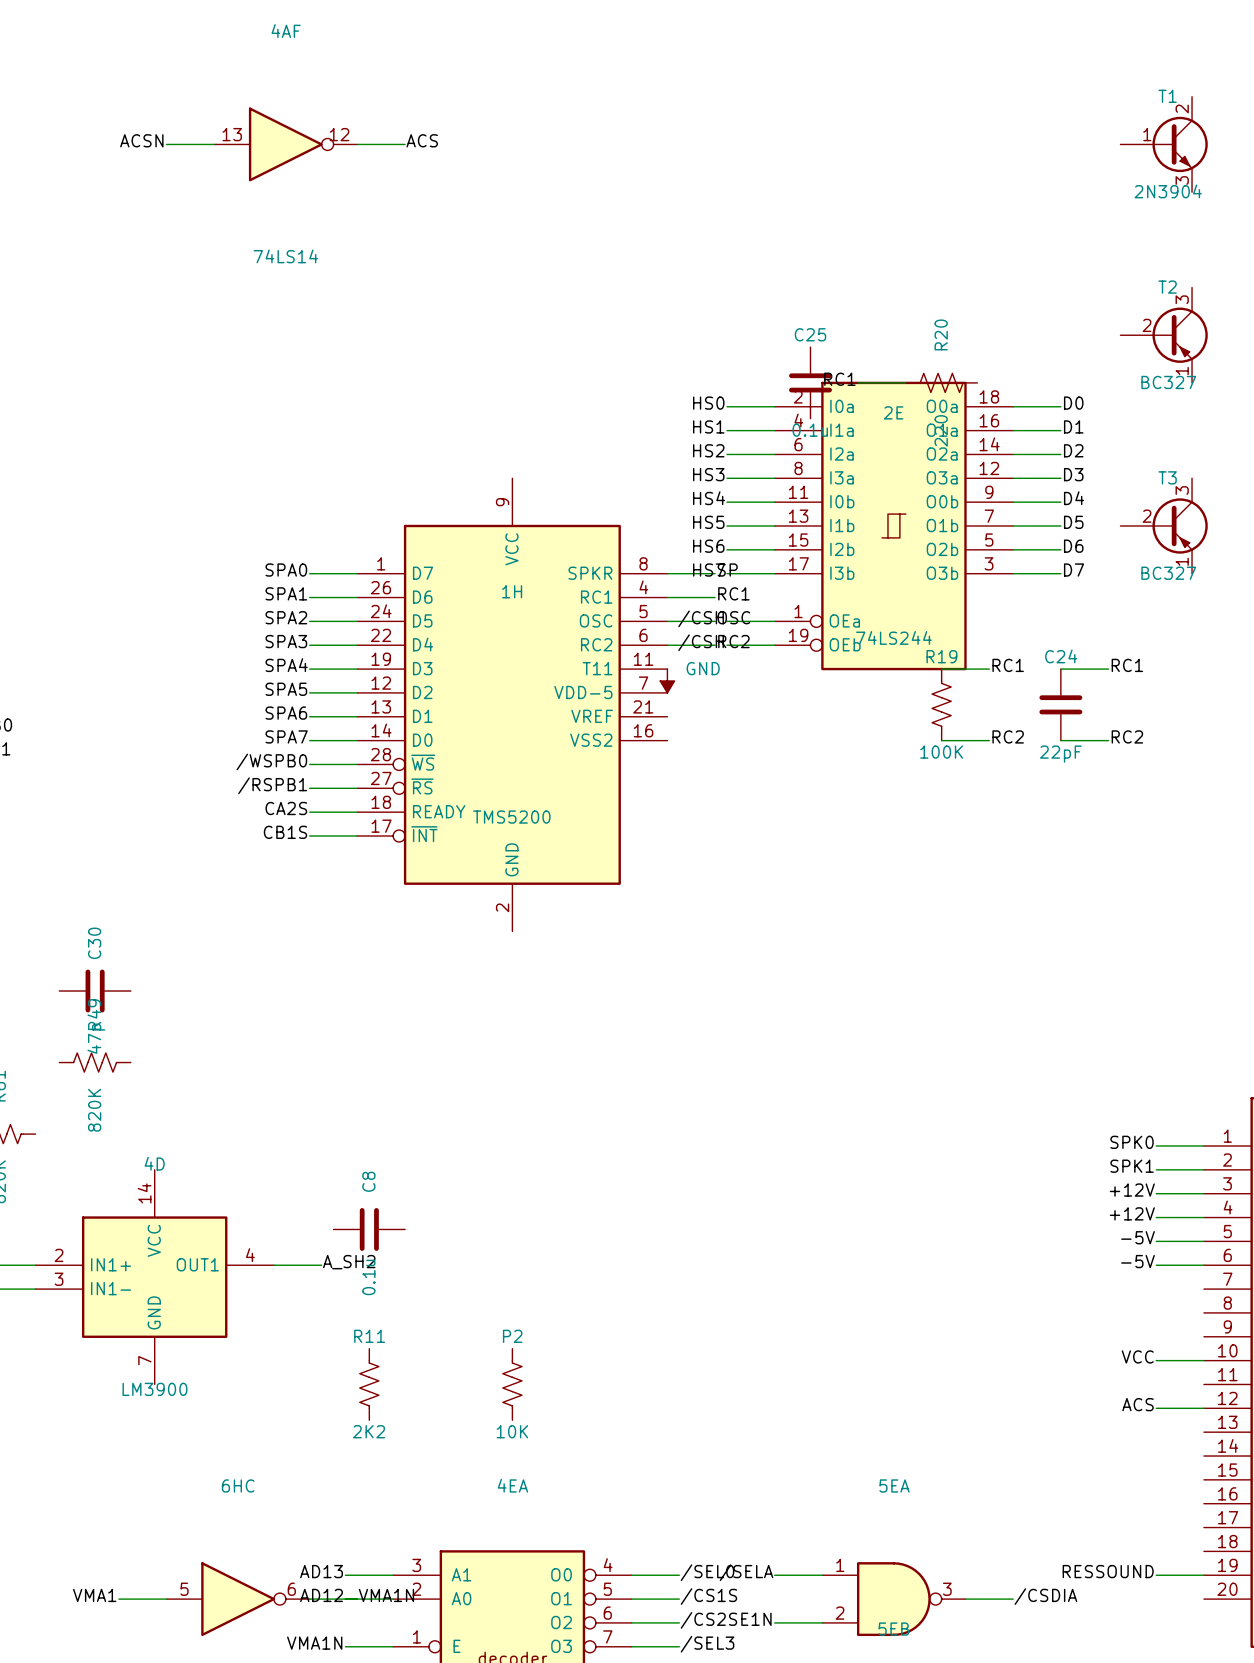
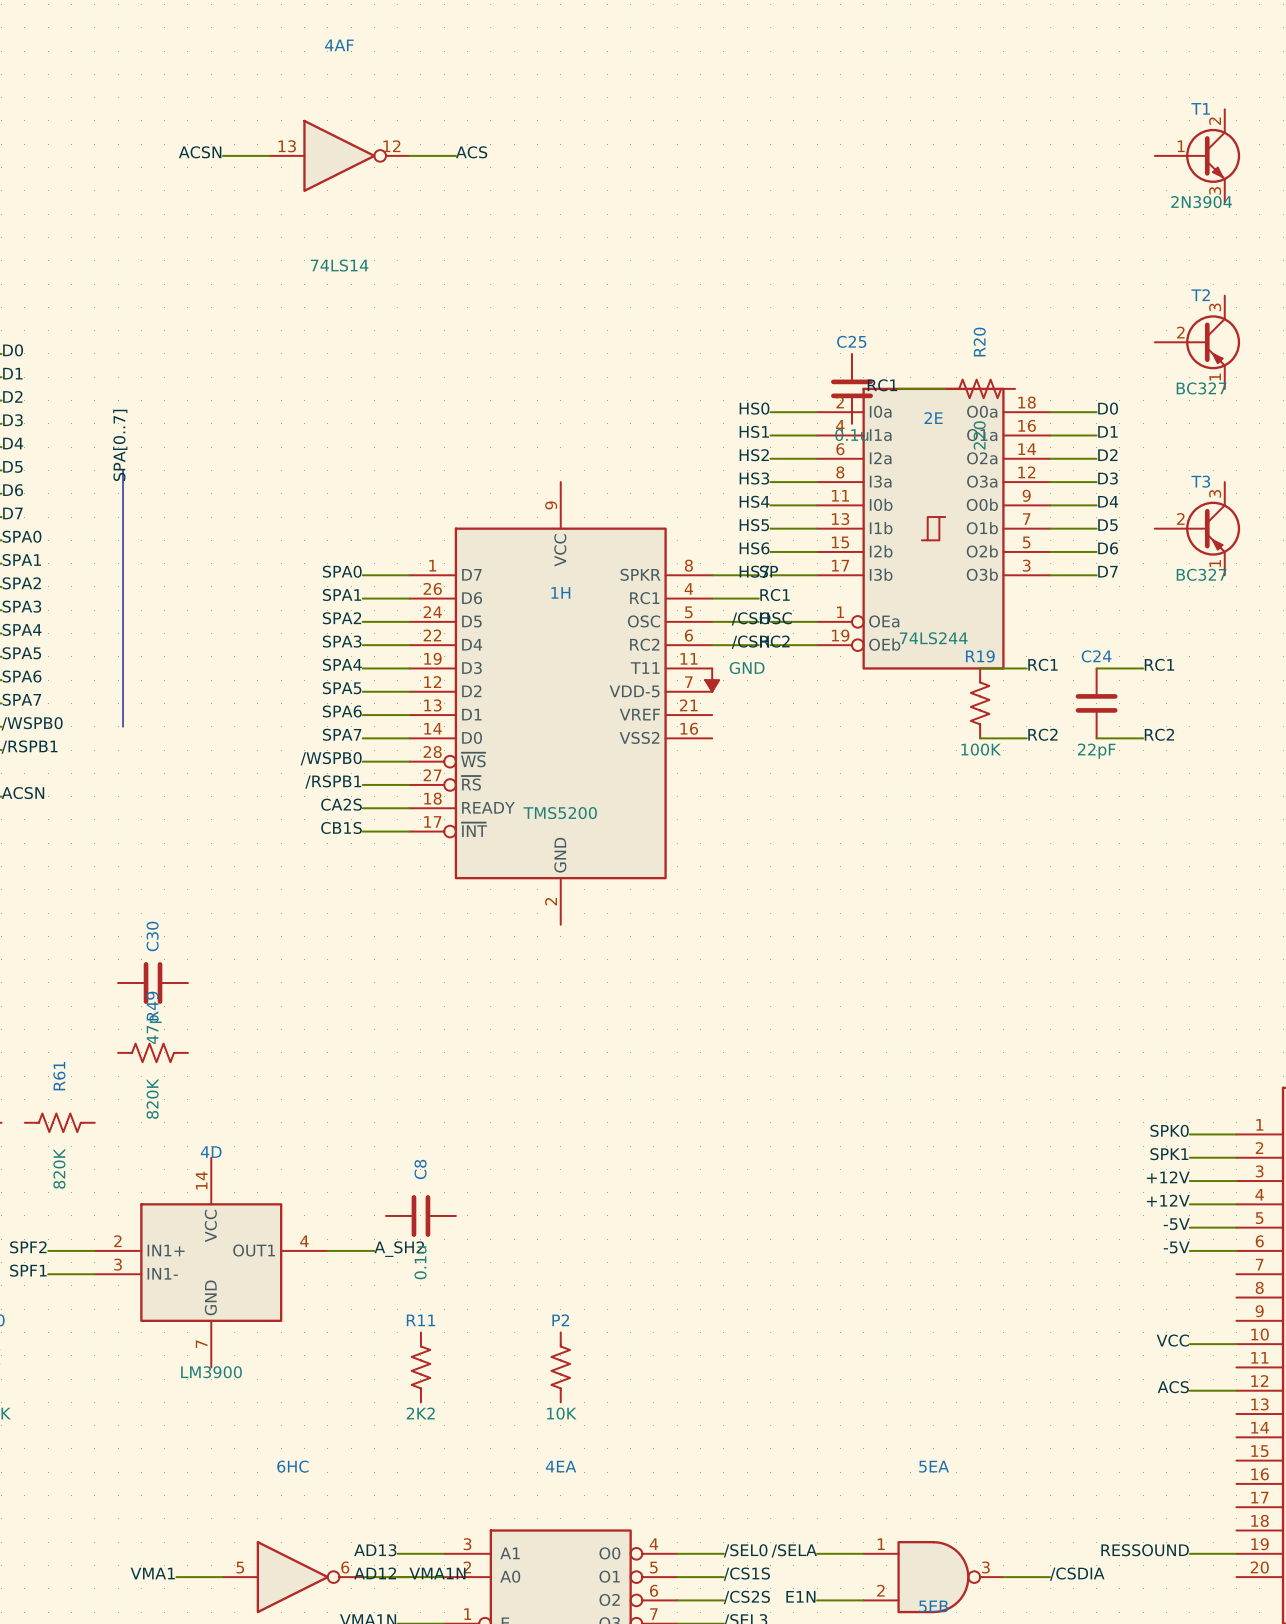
label: none -> SPA[0..7] (120, 445)
bus: none -> (123, 470) (123, 726)

